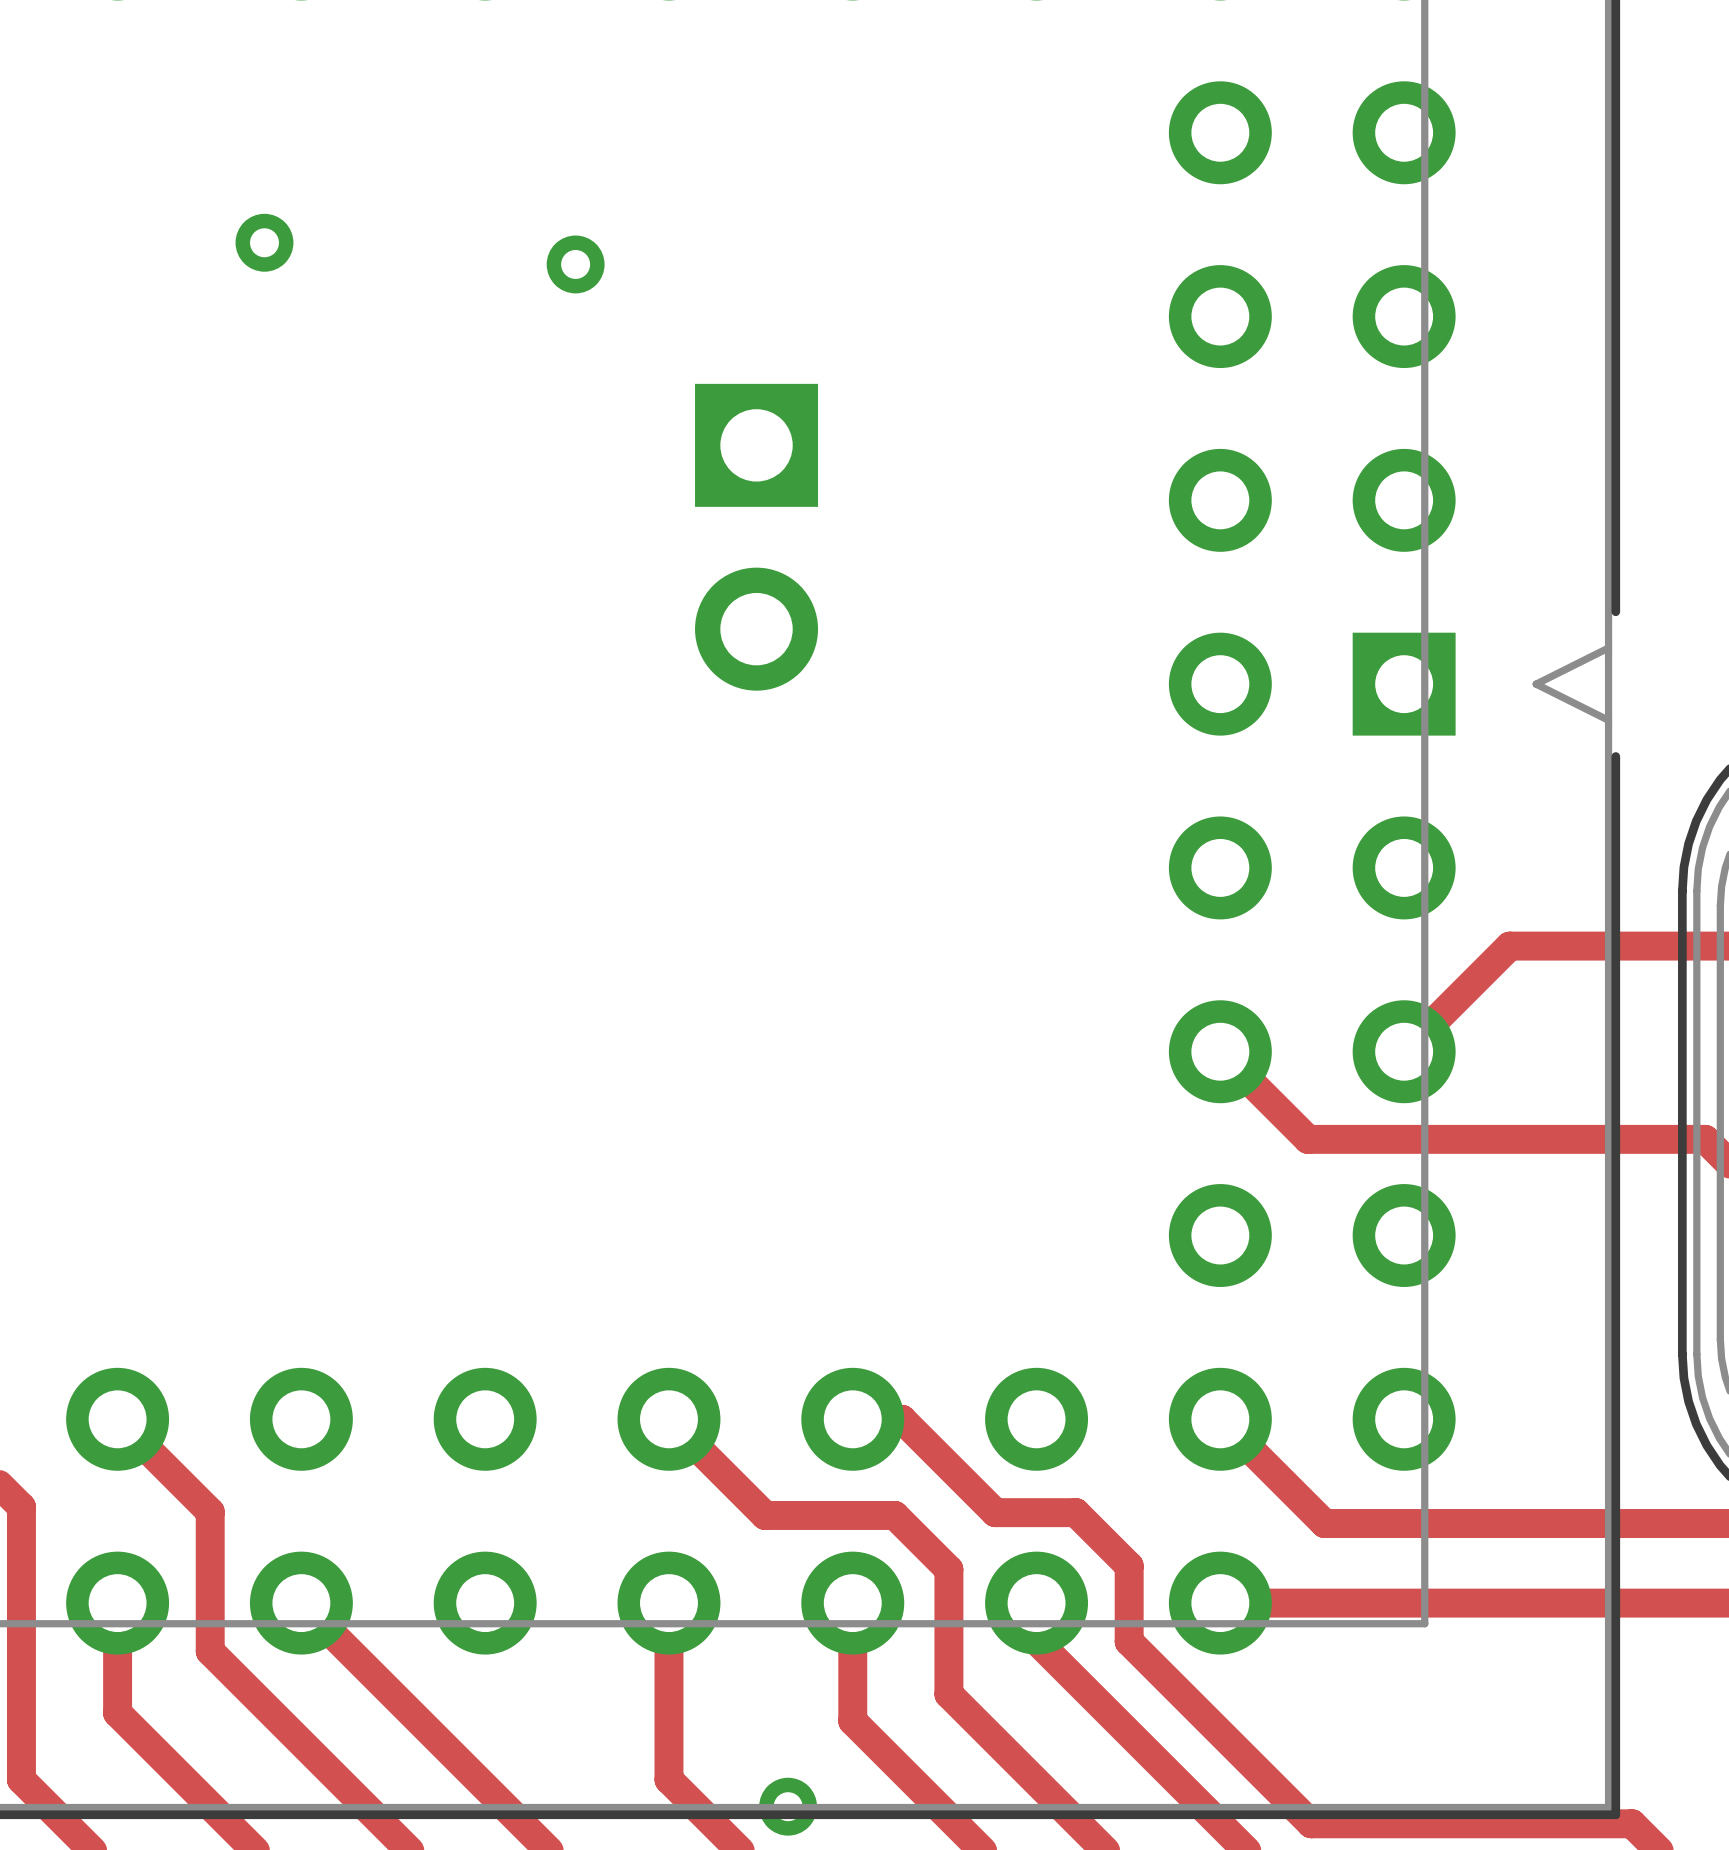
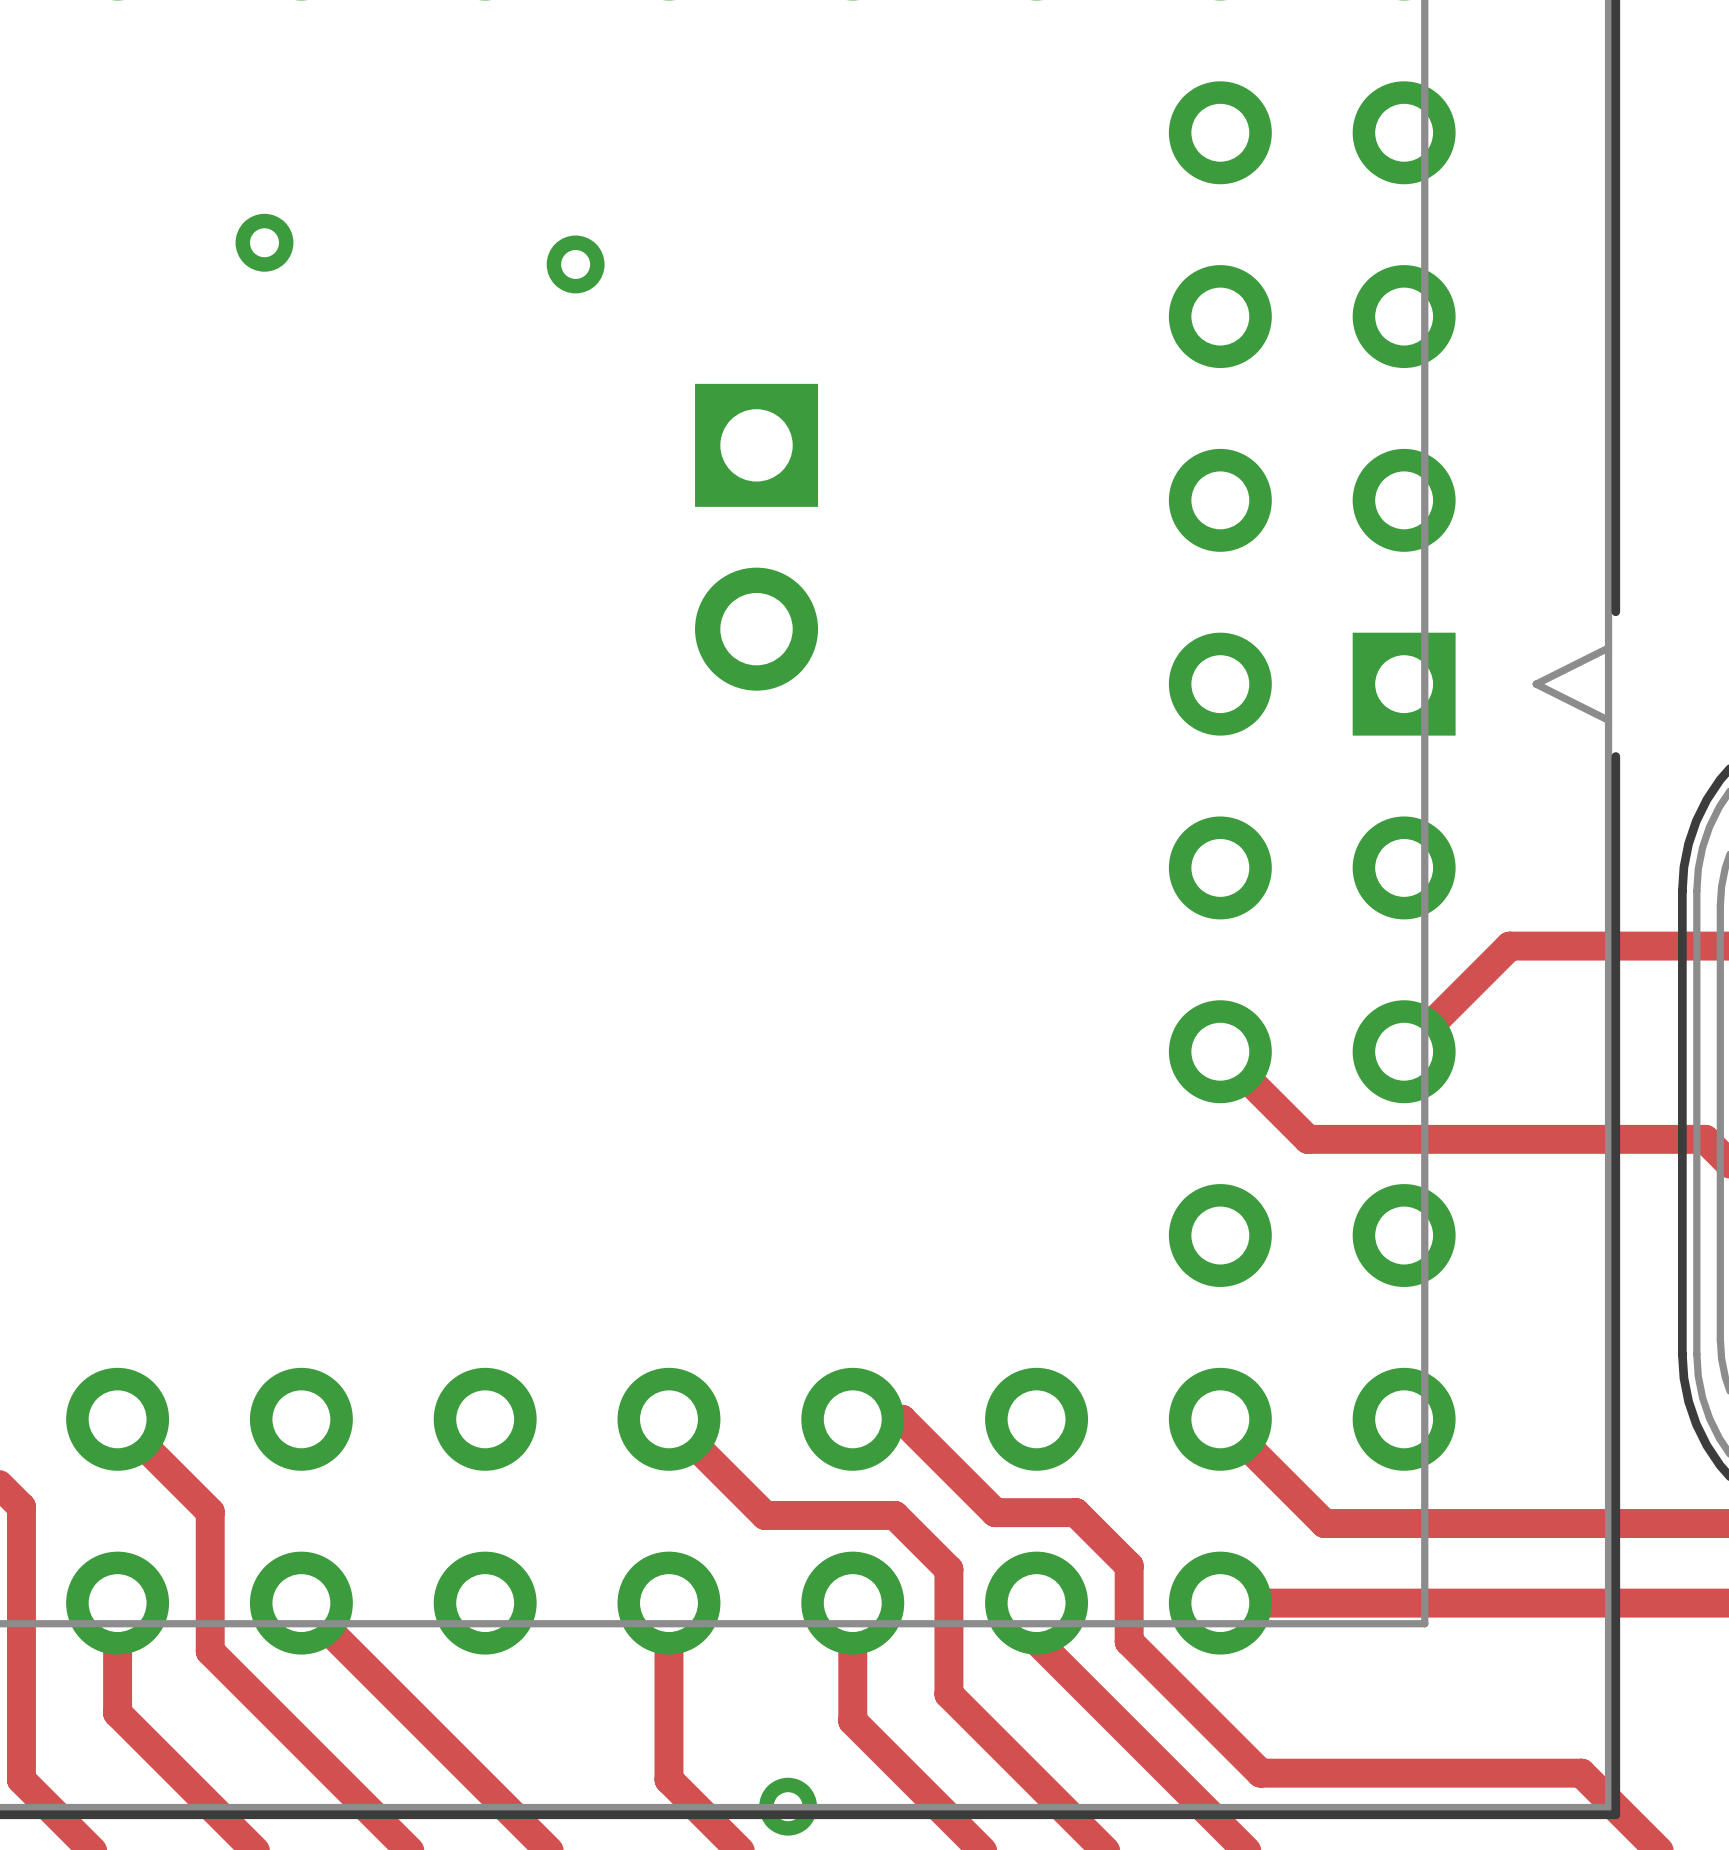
track: (1260, 1773) (1311, 1823) (1632, 1823) -> (1260, 1773) (1581, 1773) (1632, 1823)

